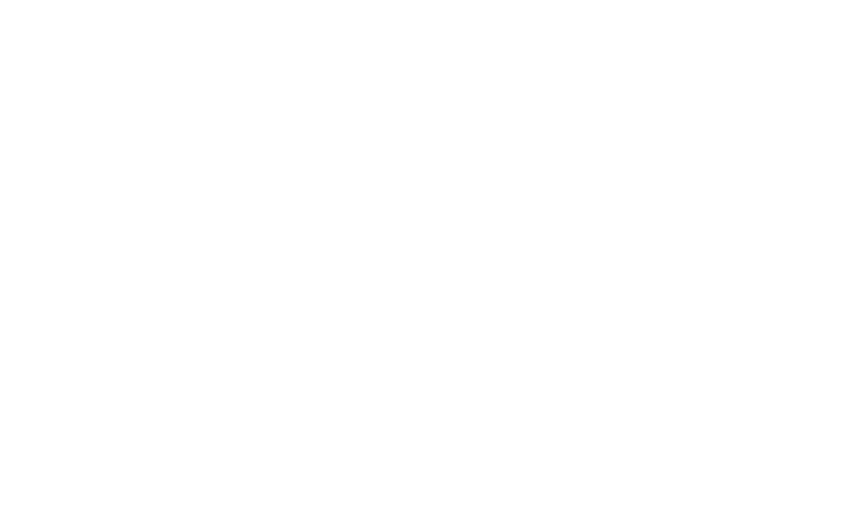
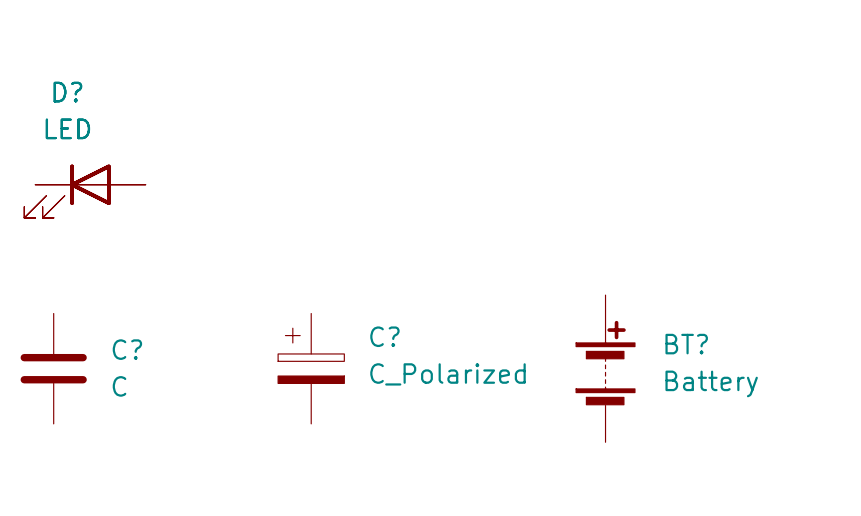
D?: none -> LED (84, 191)
C?: none -> C (53, 368)
C?: none -> C_Polarized (311, 368)
BT?: none -> Battery (605, 368)

